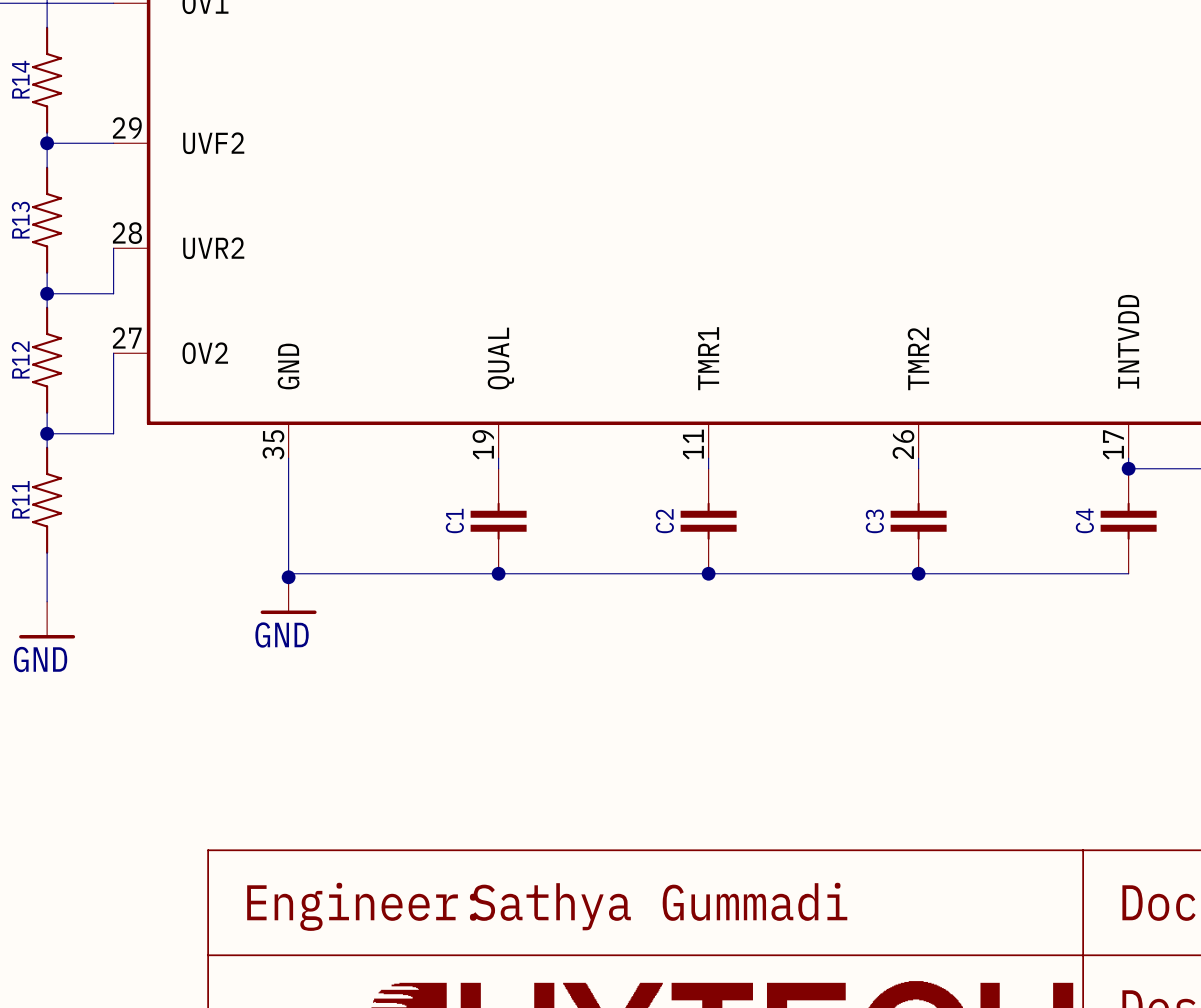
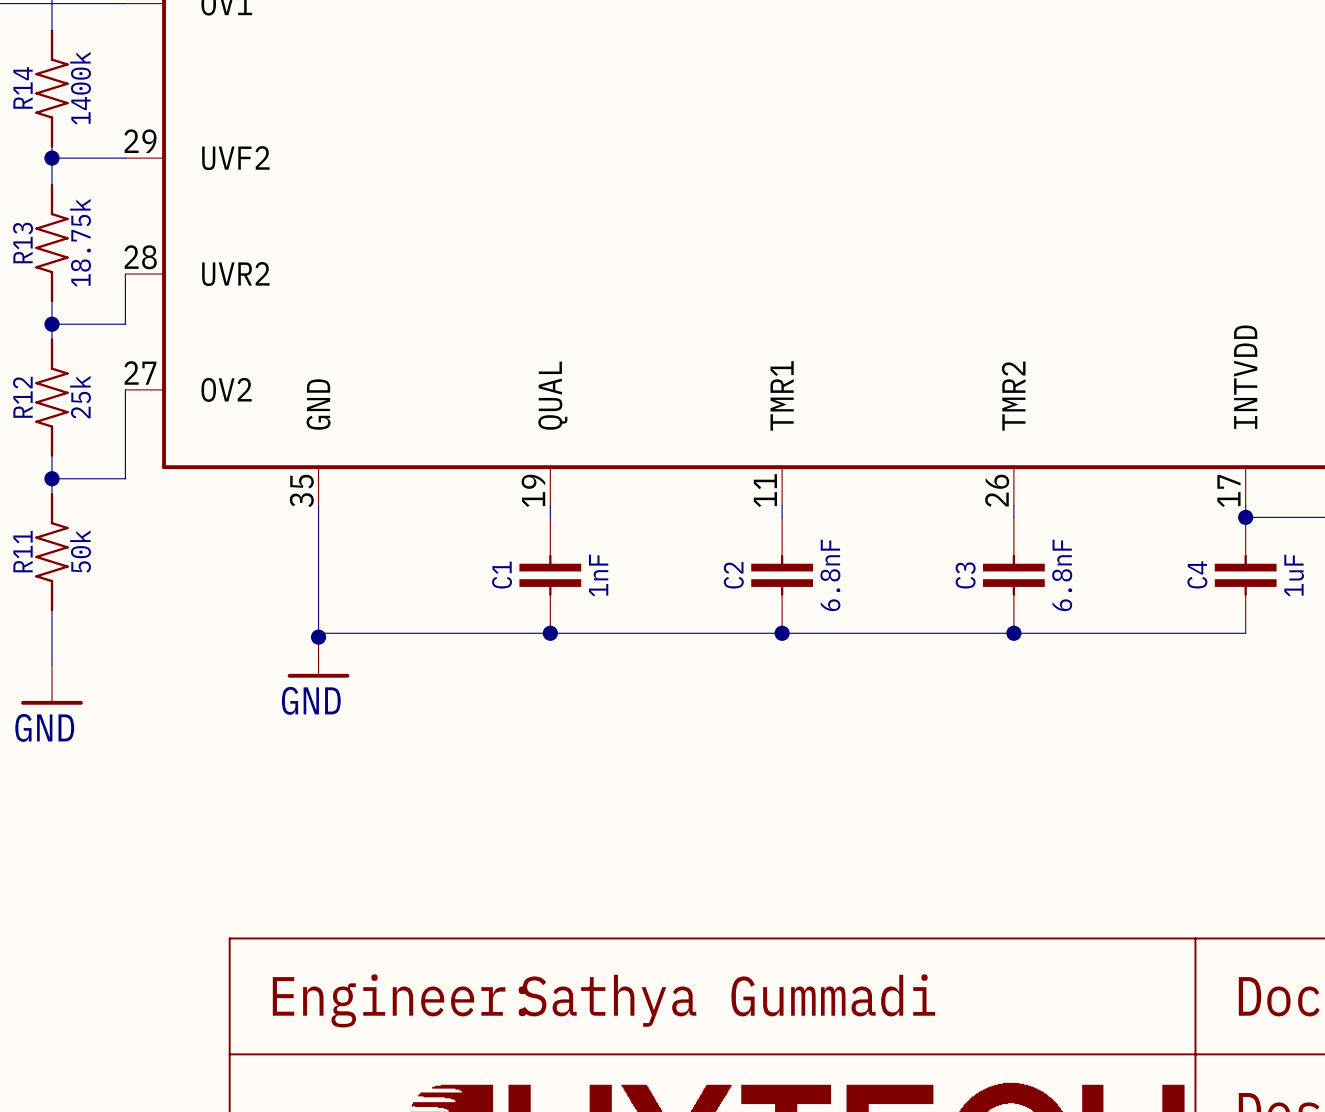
R14 value: none -> 1400k (80, 88)
R13 value: none -> 18.75k (80, 242)
R12 value: none -> 25k (80, 397)
R11 value: none -> 50k (80, 551)
C1 value: none -> 1nF (598, 575)
C2 value: none -> 6.8nF (830, 575)
C3 value: none -> 6.8nF (1062, 575)
C4 value: none -> 1uF (1294, 575)

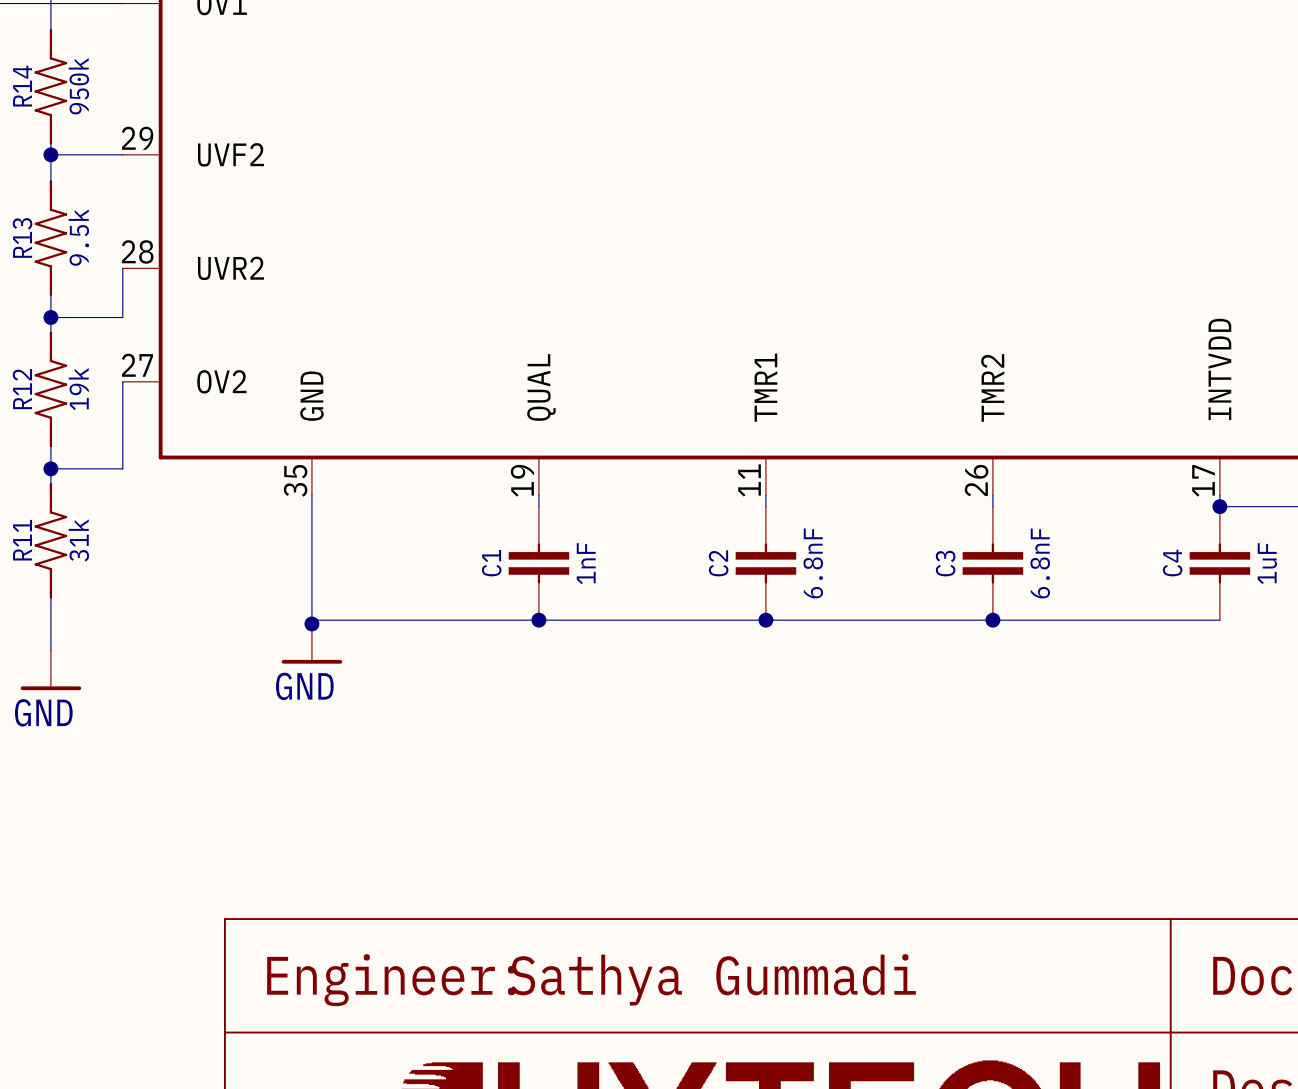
R14 value: 1400k (80, 88) -> 950k (78, 86)
R13 value: 18.75k (80, 242) -> 9.5k (78, 237)
R12 value: 25k (80, 397) -> 19k (78, 389)
R11 value: 50k (80, 551) -> 31k (78, 540)

